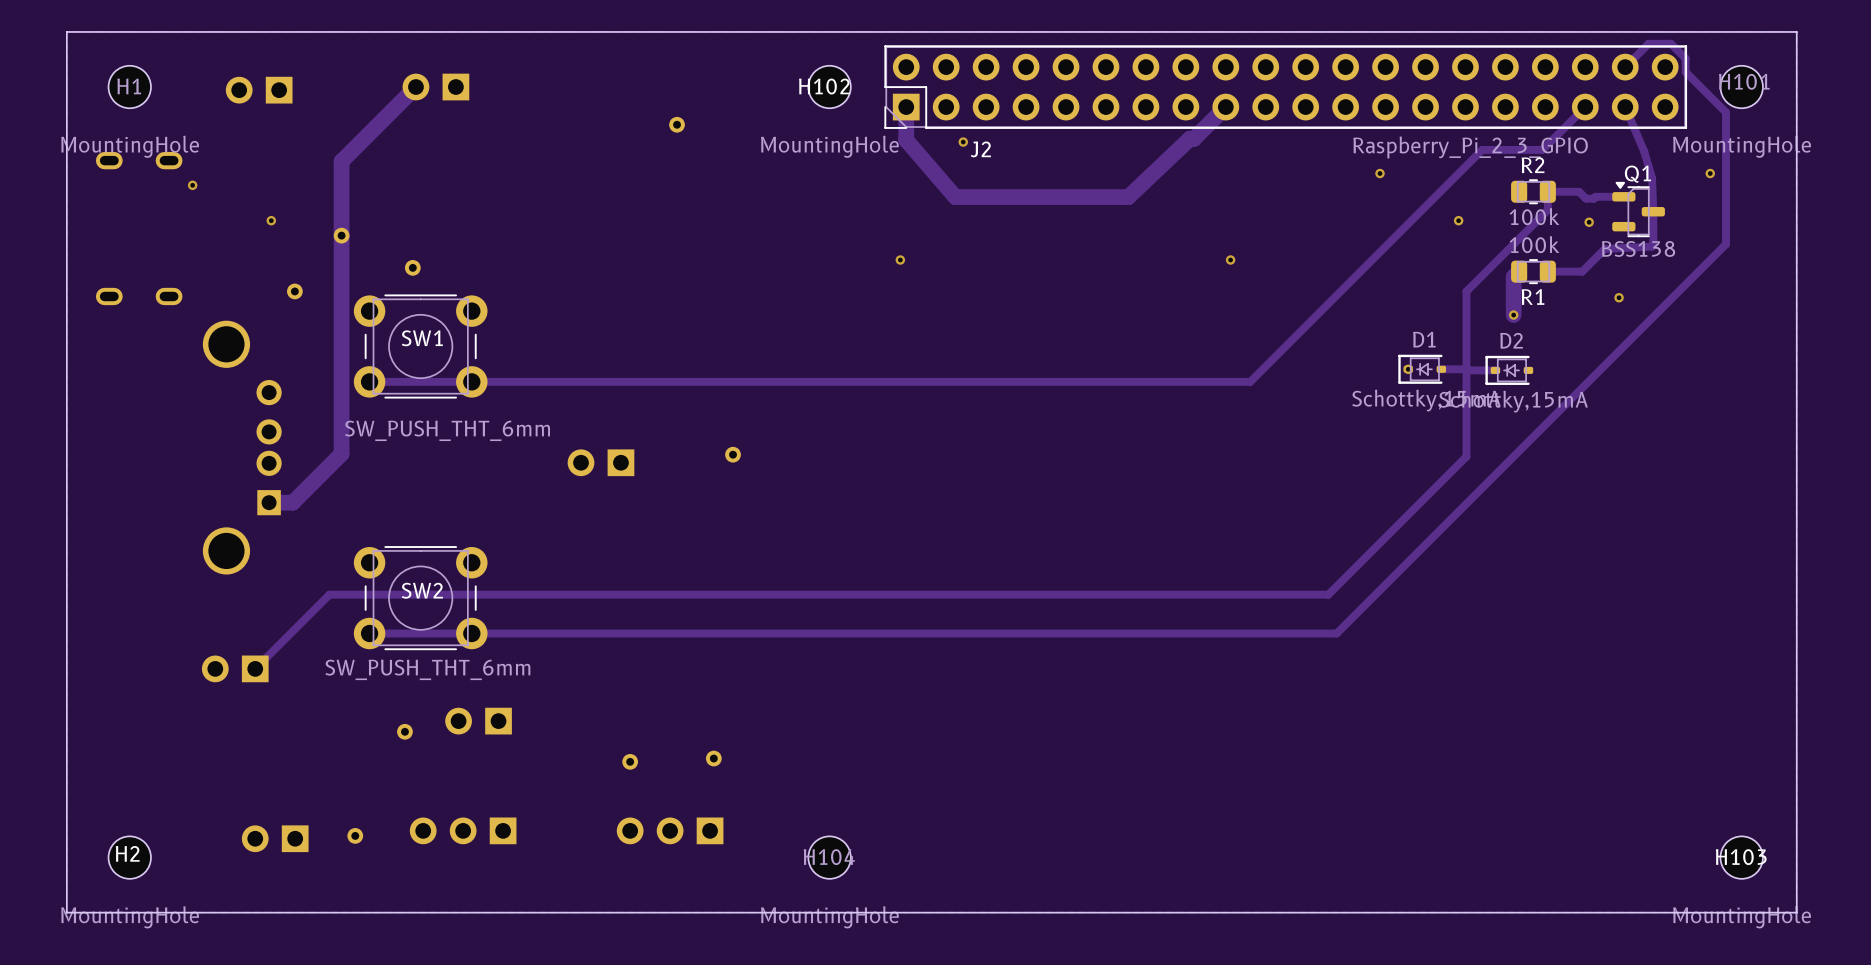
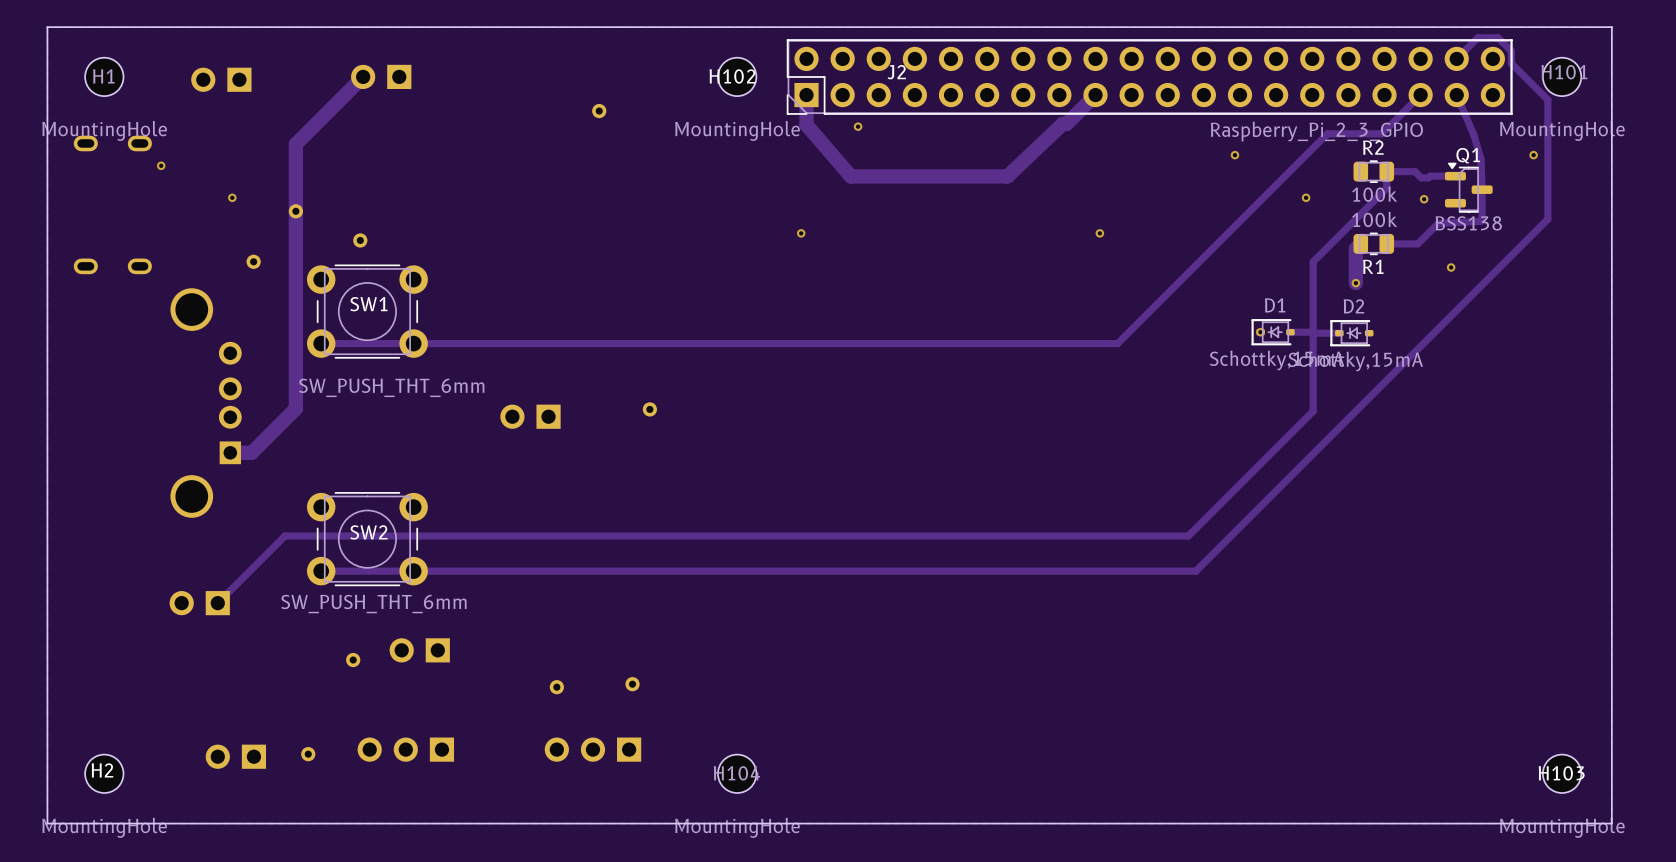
J2 name position: J2 (980, 149) -> J2 (896, 72)

